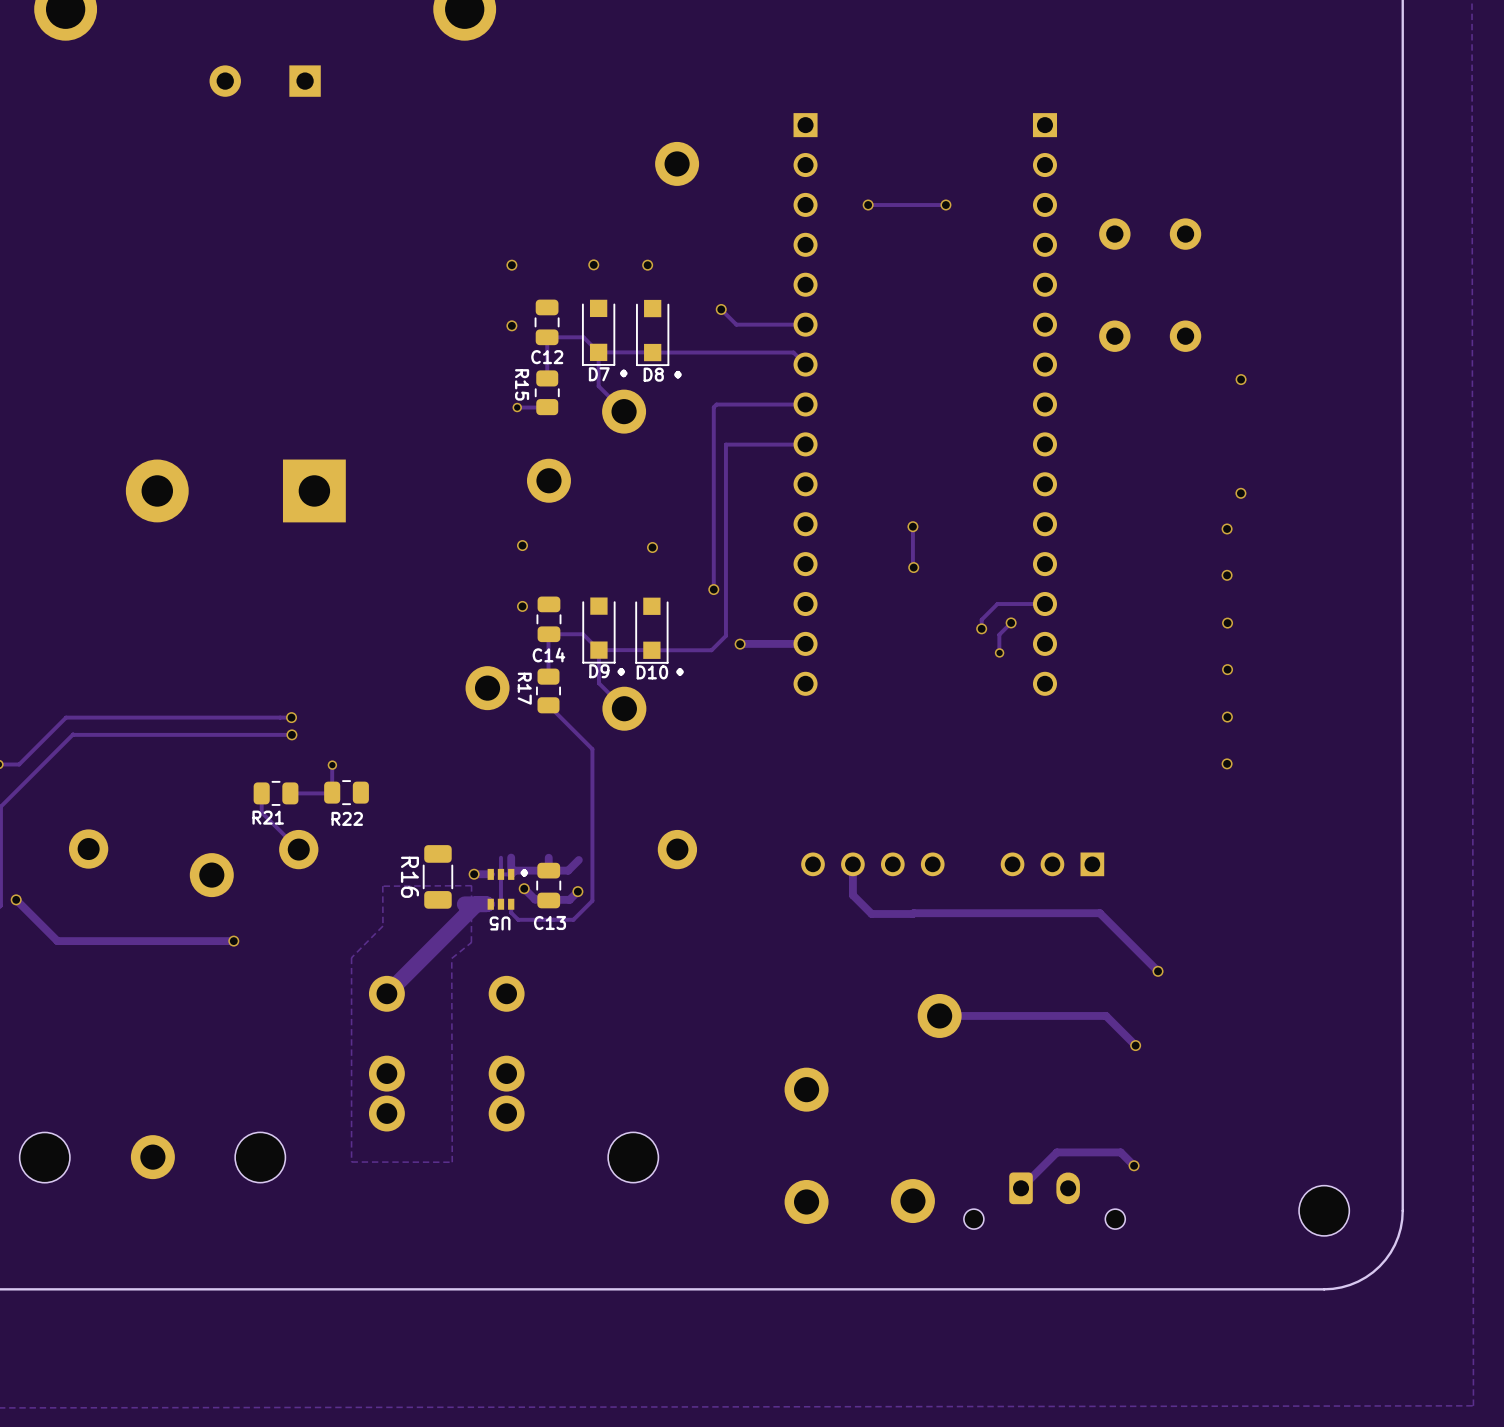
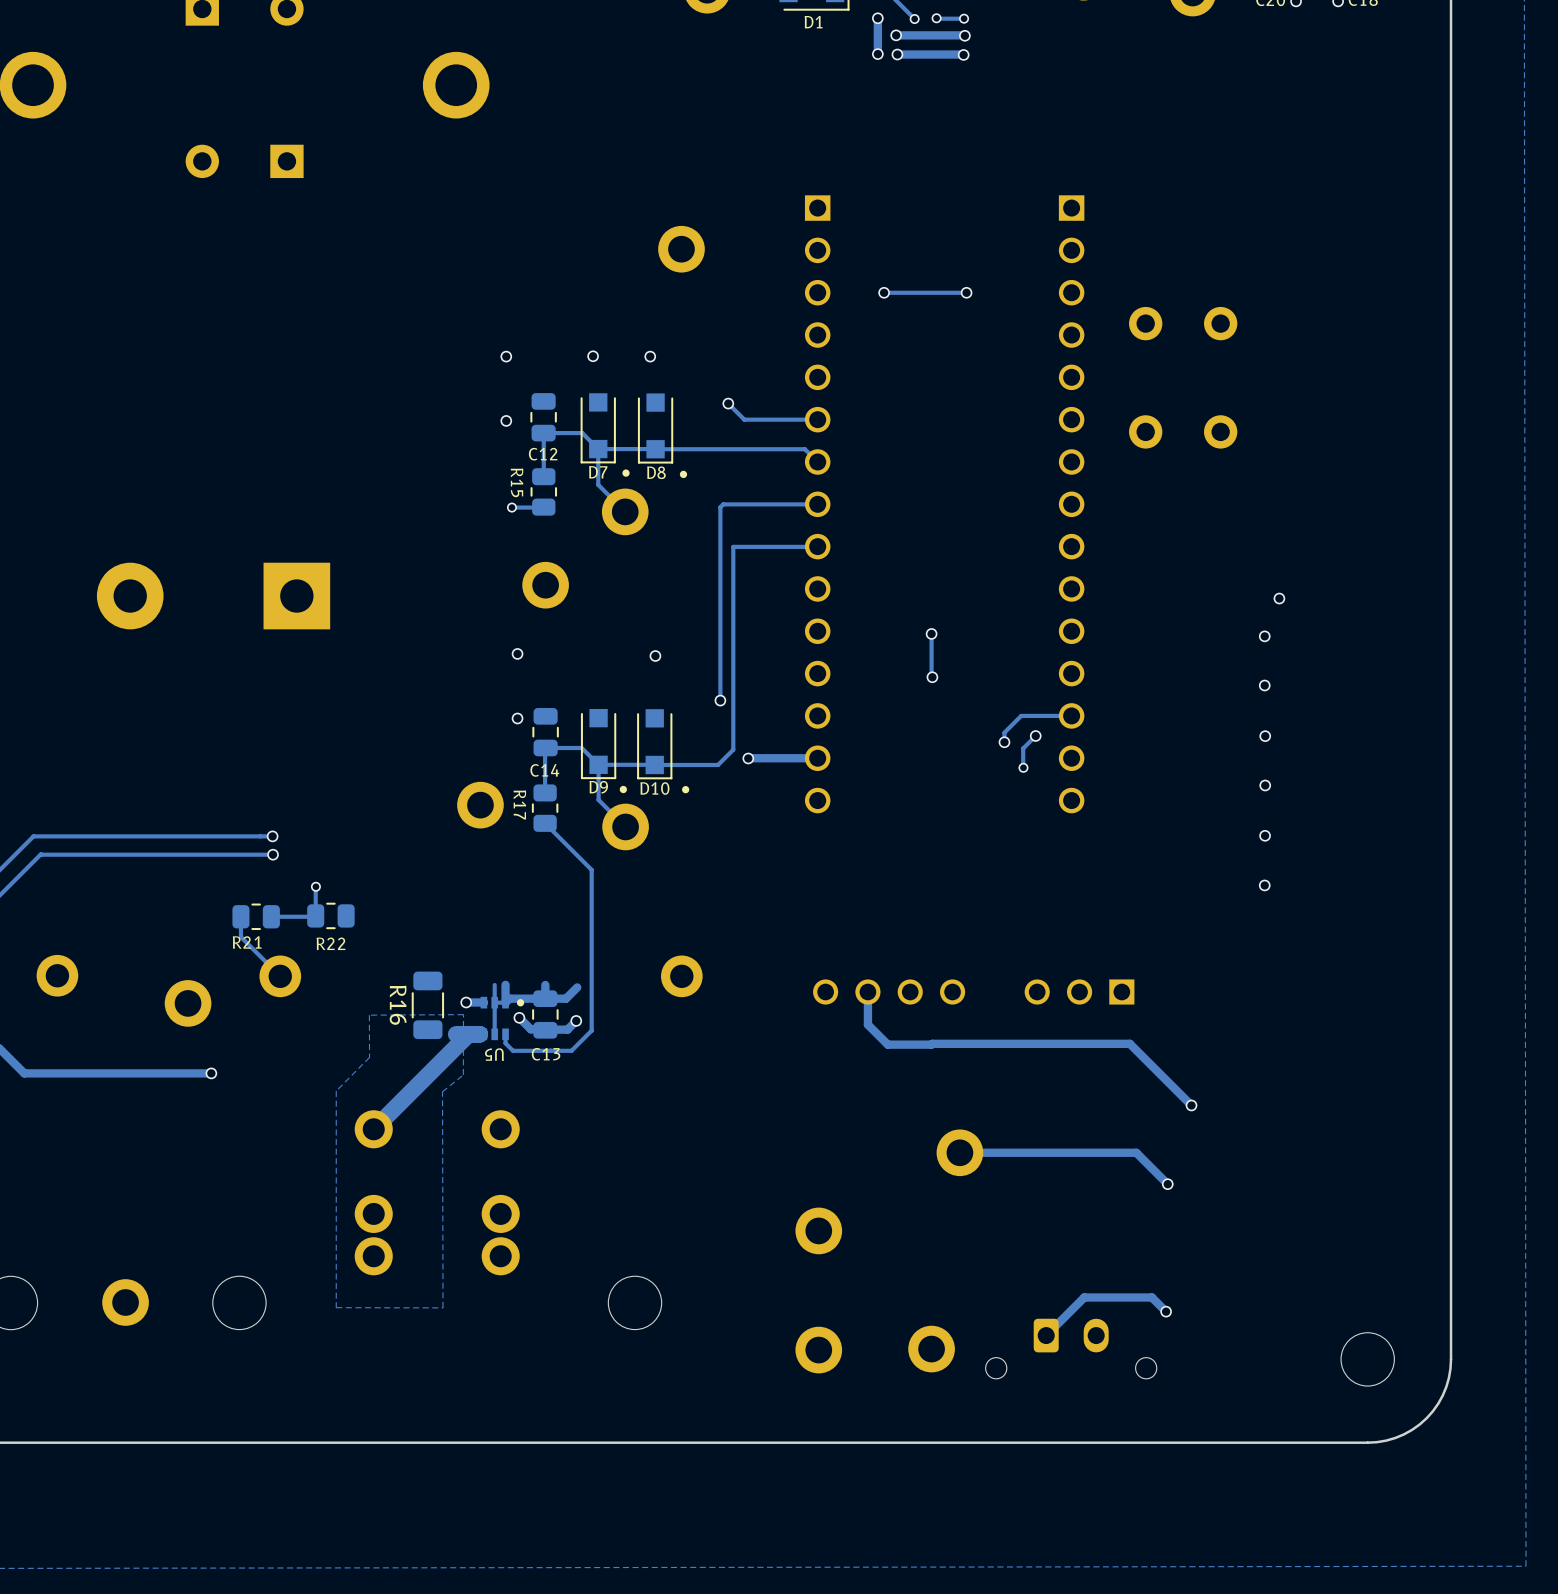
via: (1241, 379) -> none

